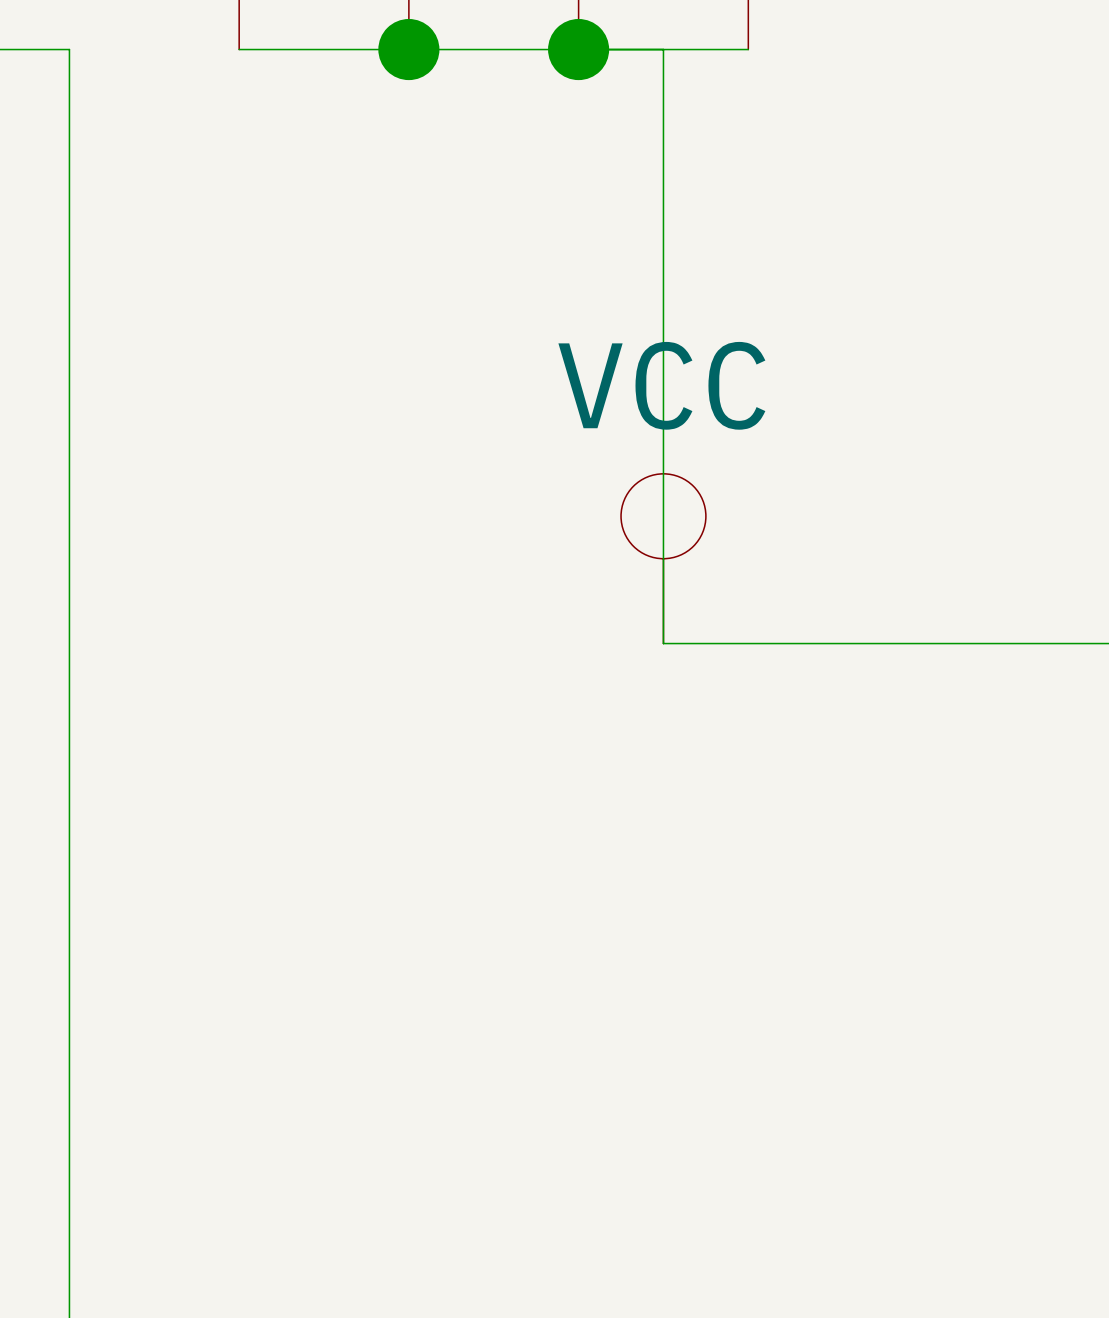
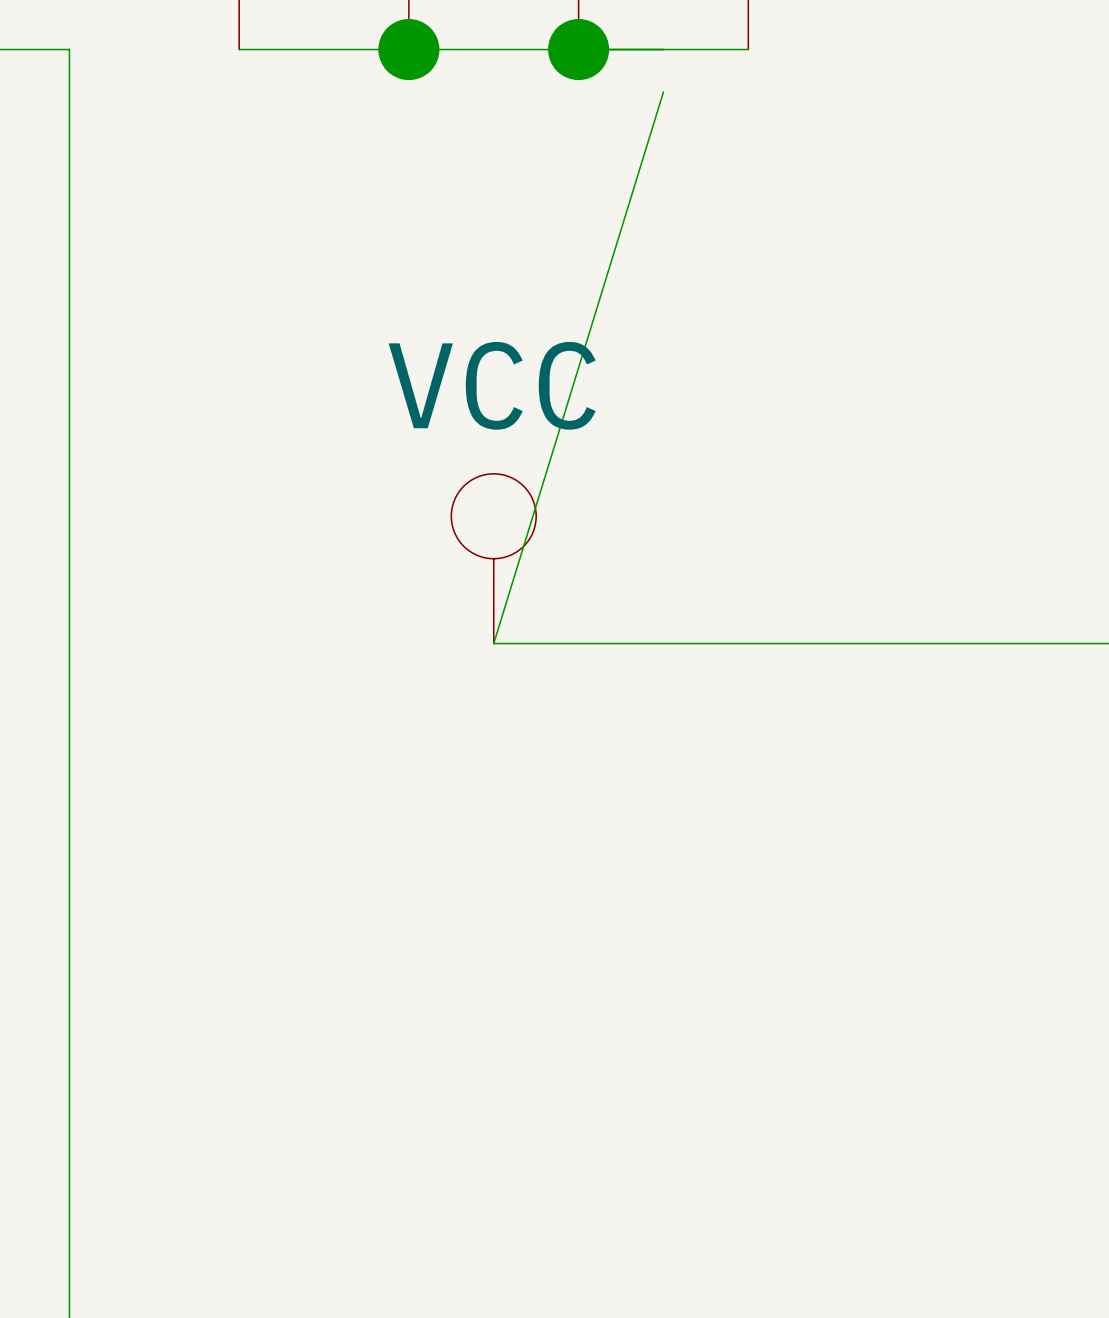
wire: (663, 49) (663, 643) -> (663, 91) (493, 643) (663, 643)
power symbol position: VCC (663, 558) -> VCC (493, 558)

